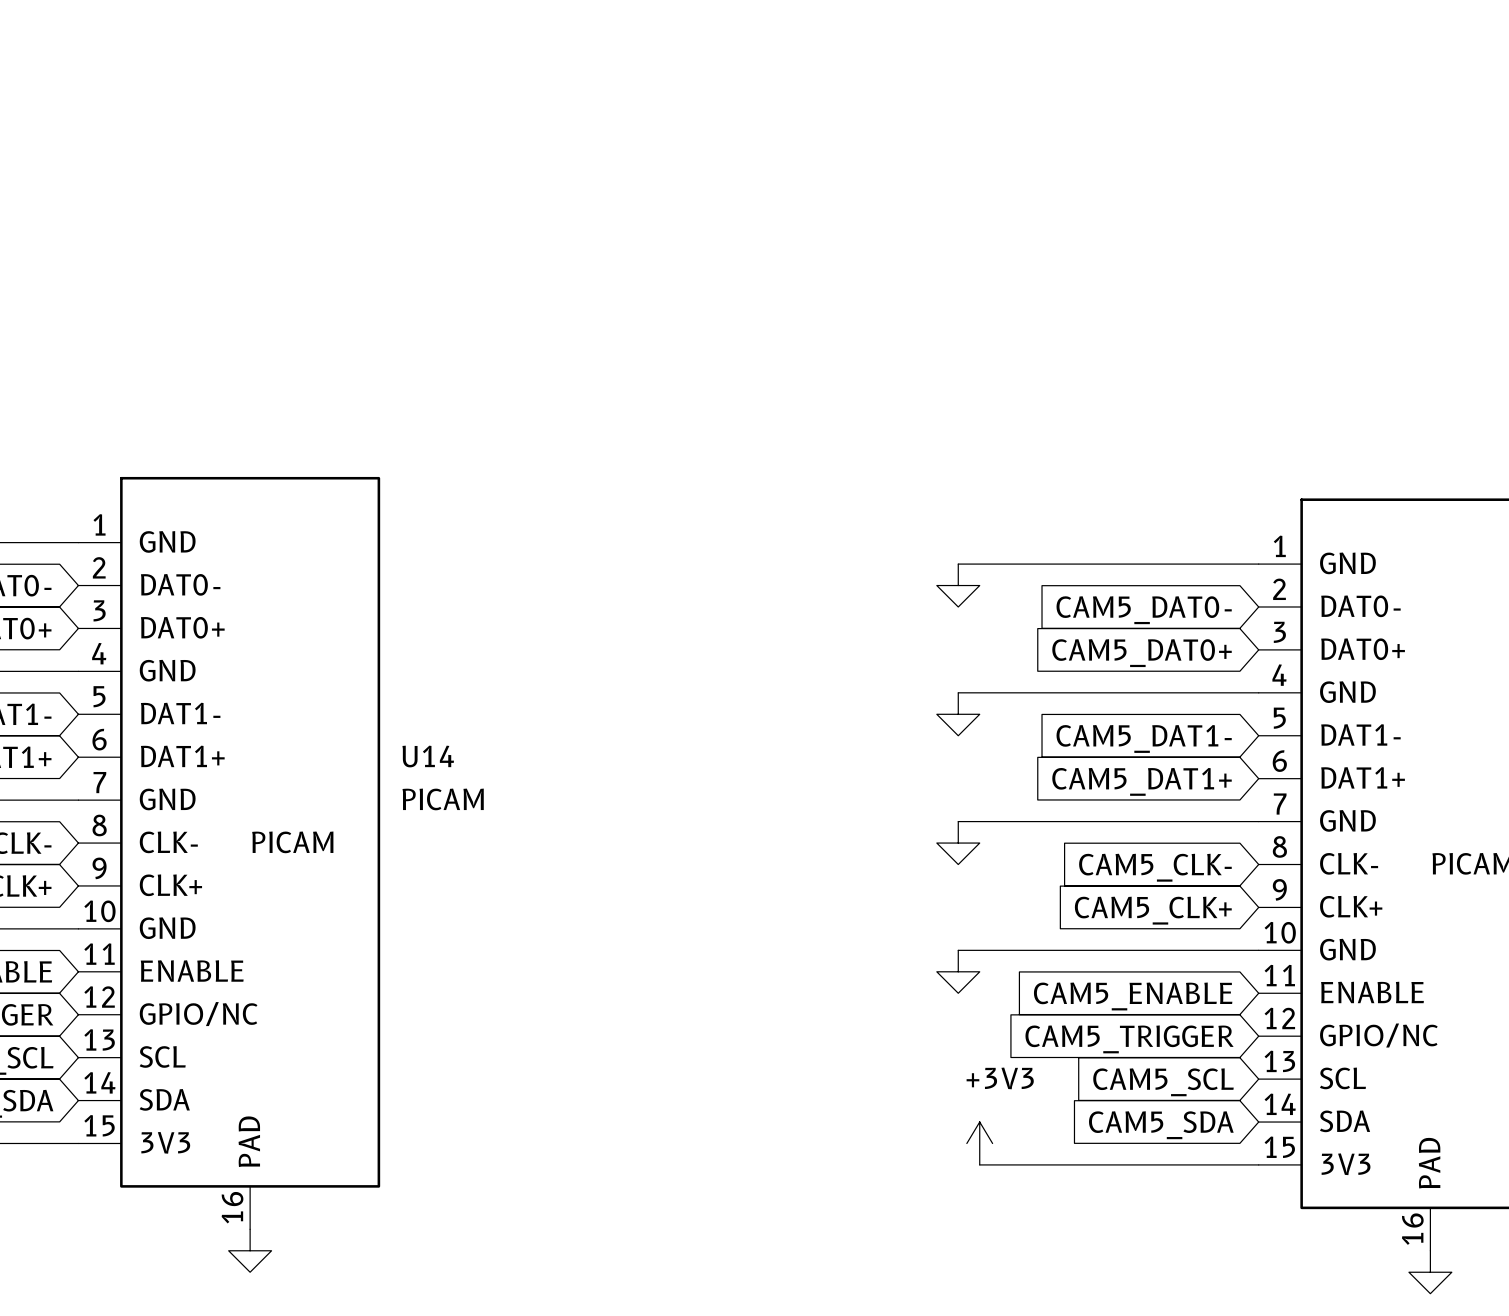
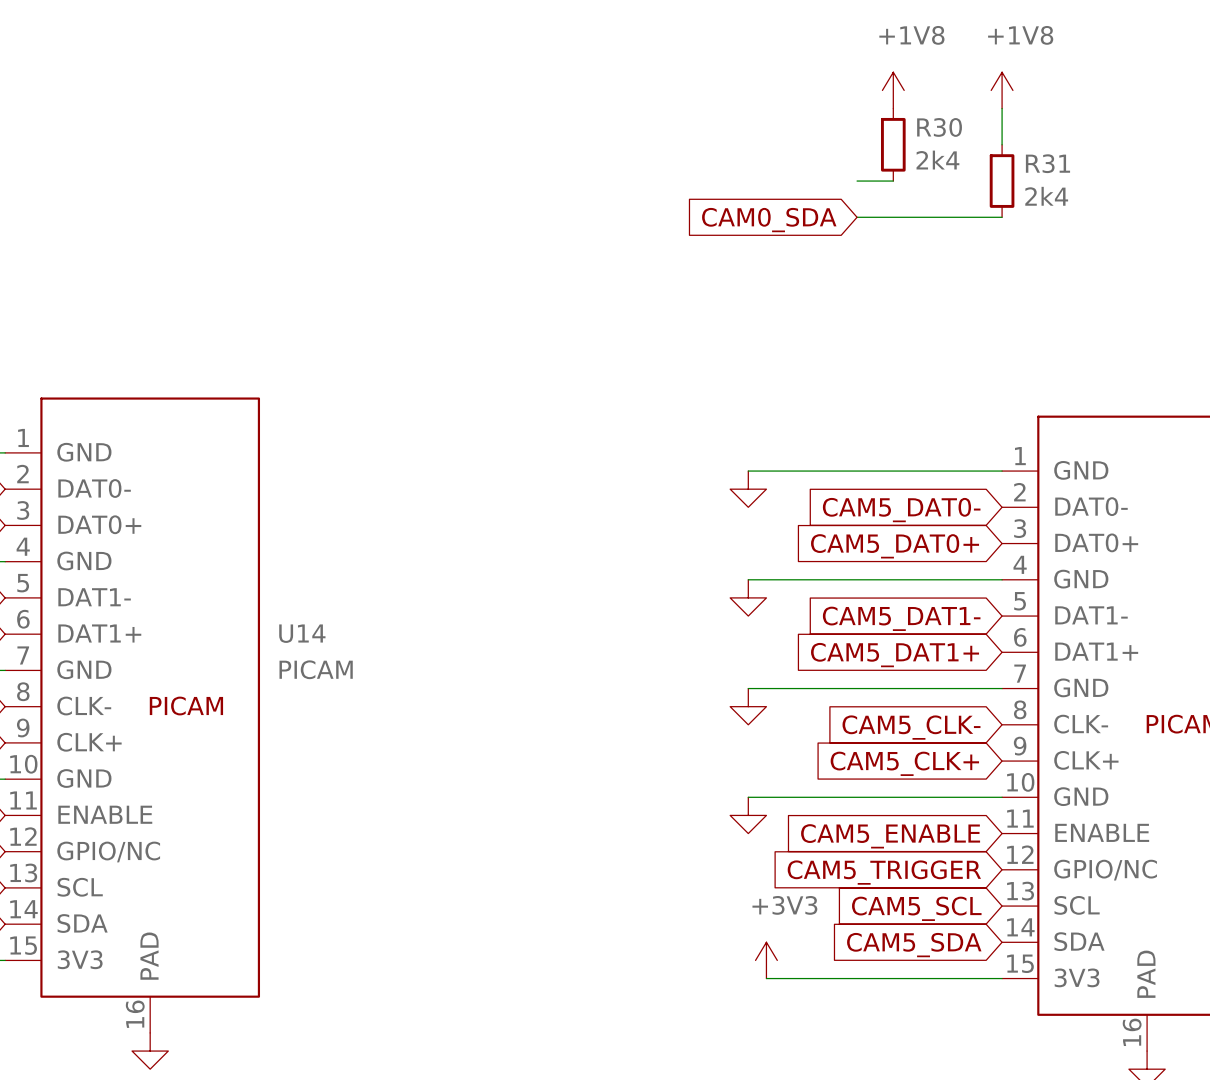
power symbol: none -> +1V8 (893, 90)
power symbol: none -> +1V8 (1002, 90)
wire: none -> (1002, 108) (1002, 144)
R30: none -> 2k4 (893, 144)
wire: none -> (857, 181) (893, 181)
R31: none -> 2k4 (1002, 181)
wire: none -> (857, 217) (1002, 217)
global label: none -> CAM0_SDA (769, 220)

